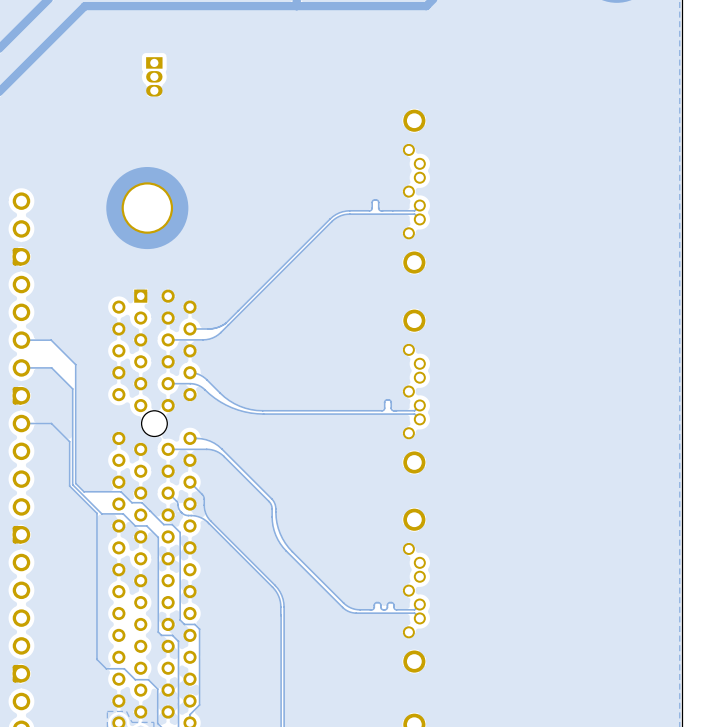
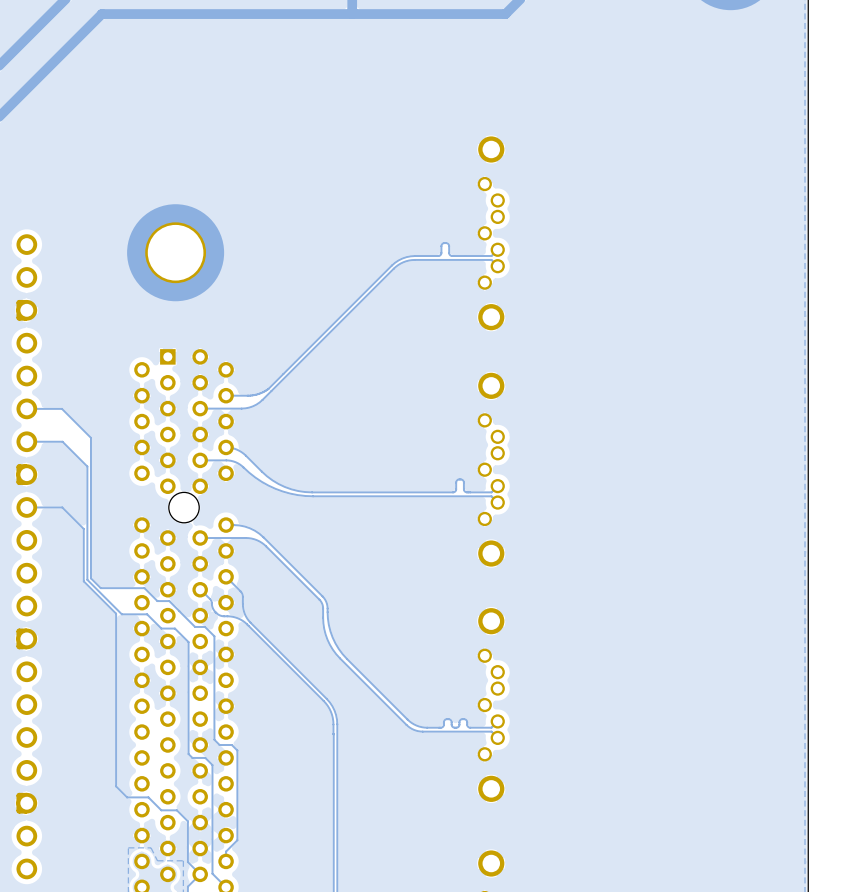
part: (154, 76) -> none

